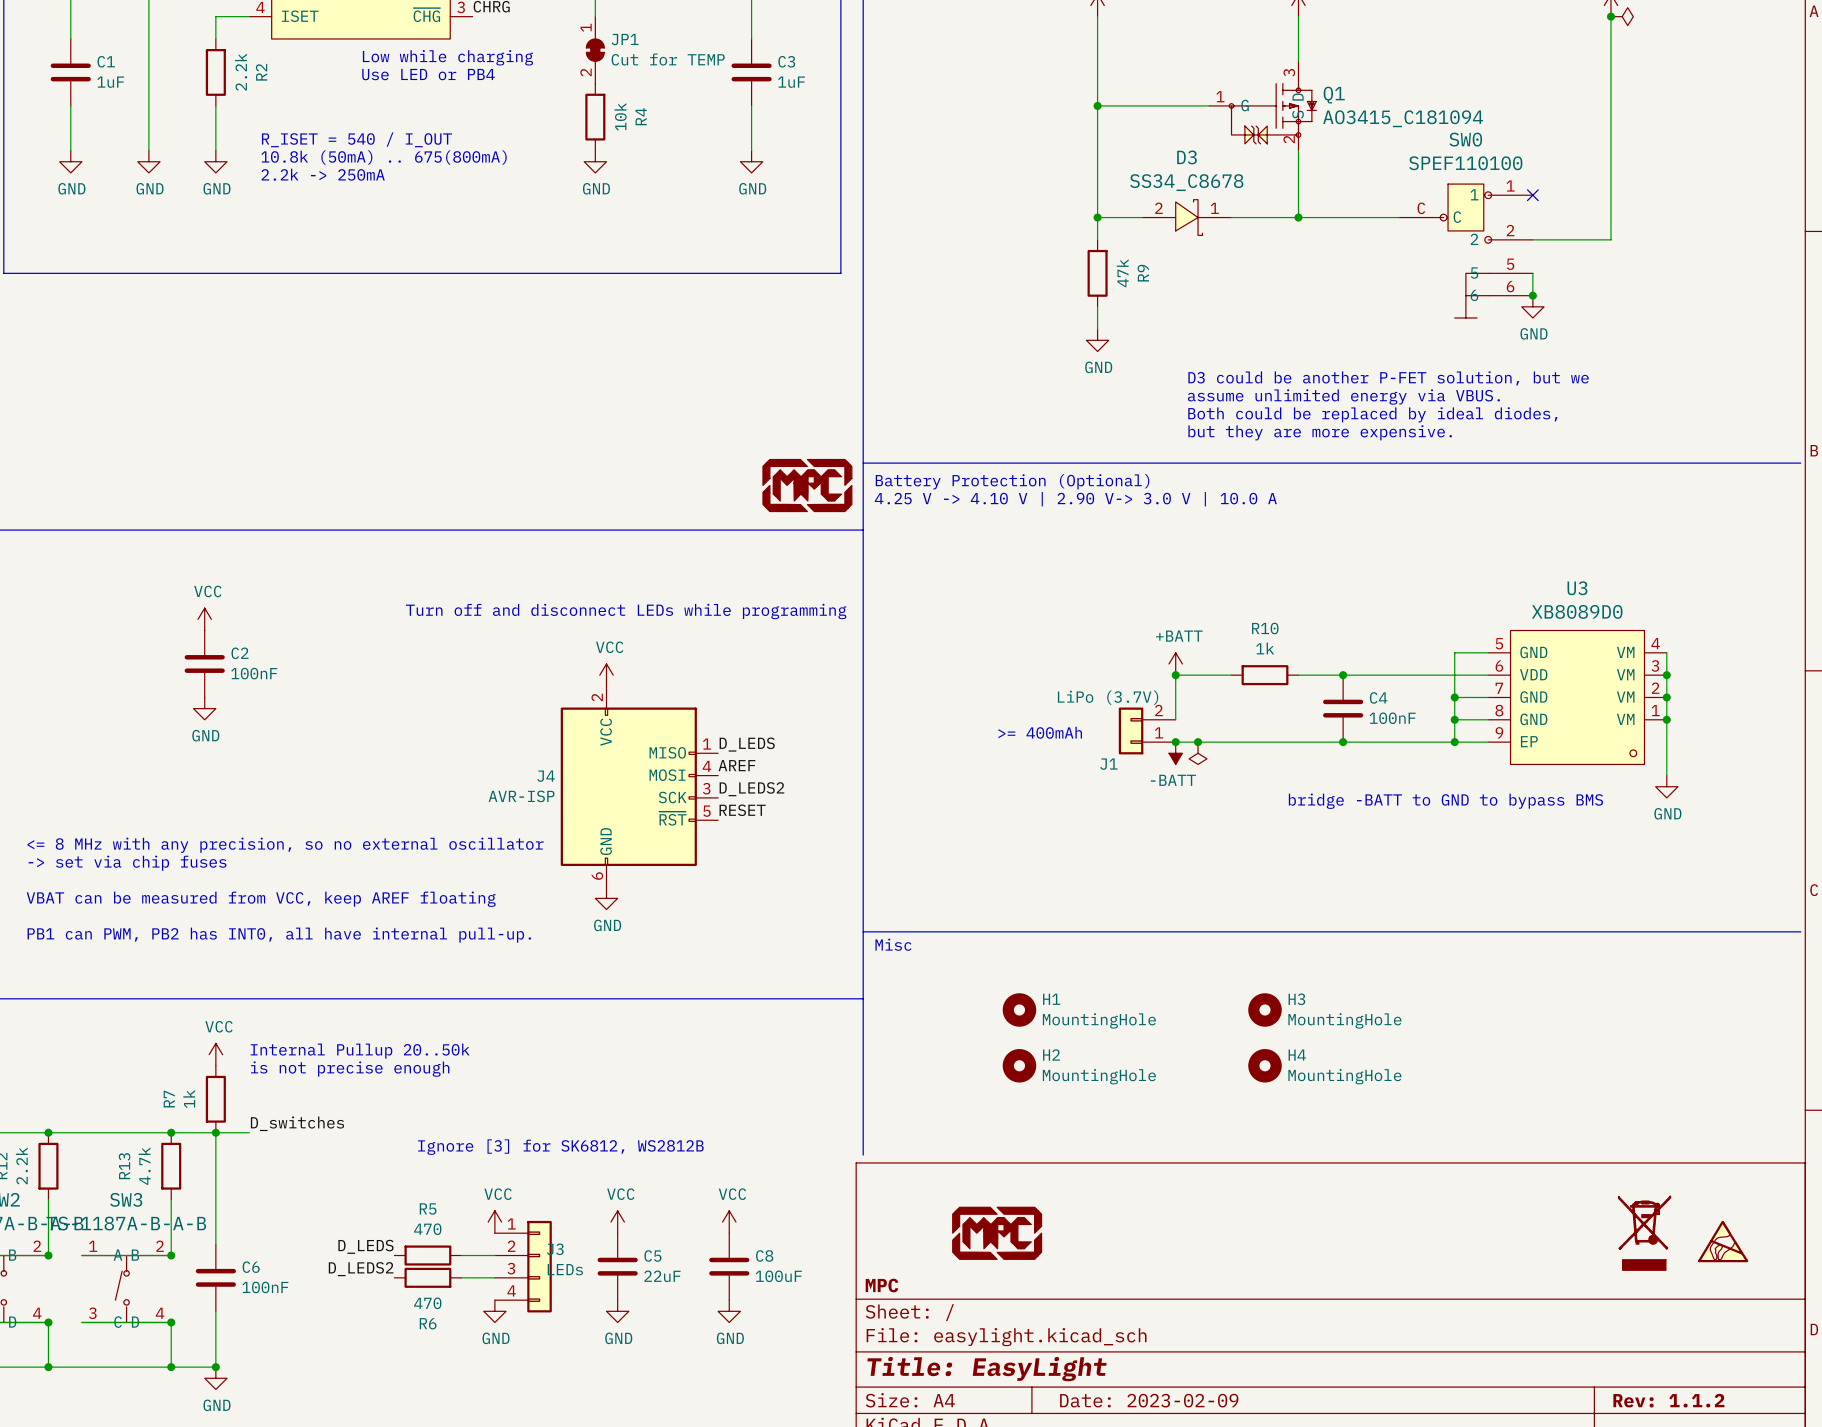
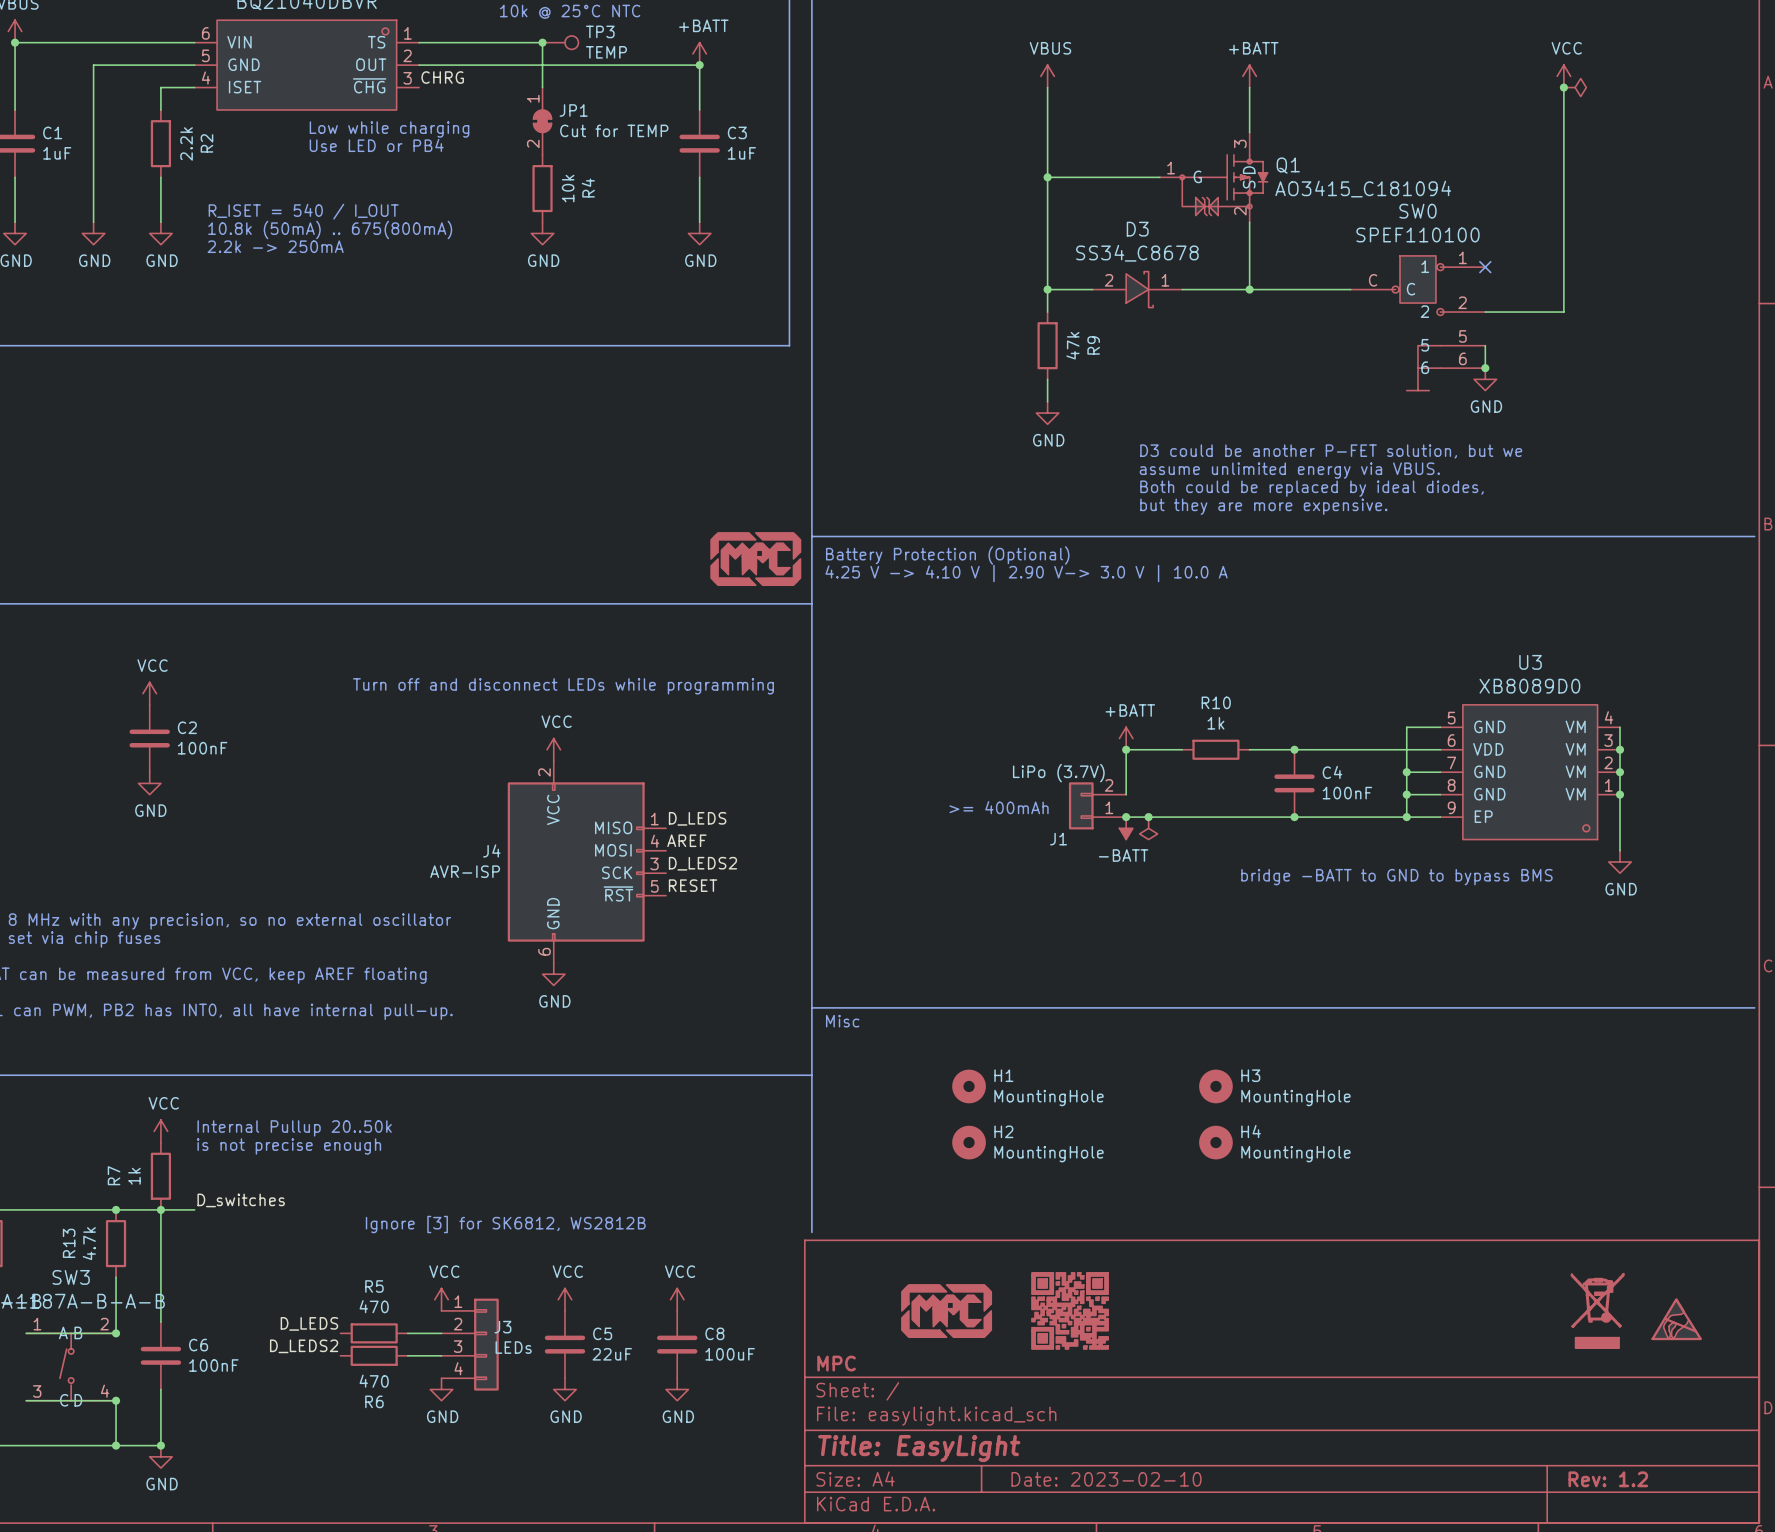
part: none -> (1070, 1310)
title block: Date: 2023-02-09 (1149, 1400) -> Date: 2023-02-10 (1106, 1479)
title block: Rev: 1.1.2 (1668, 1400) -> Rev: 1.2 (1608, 1479)

